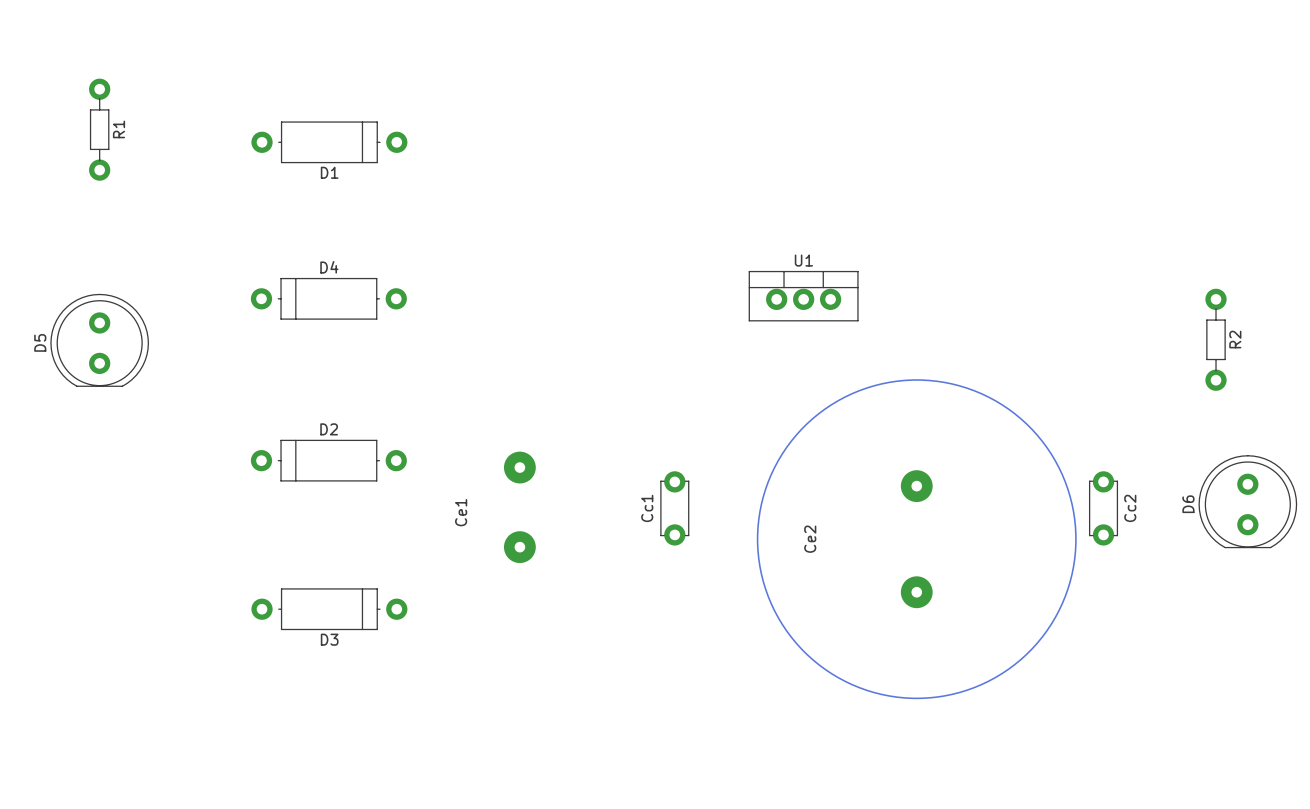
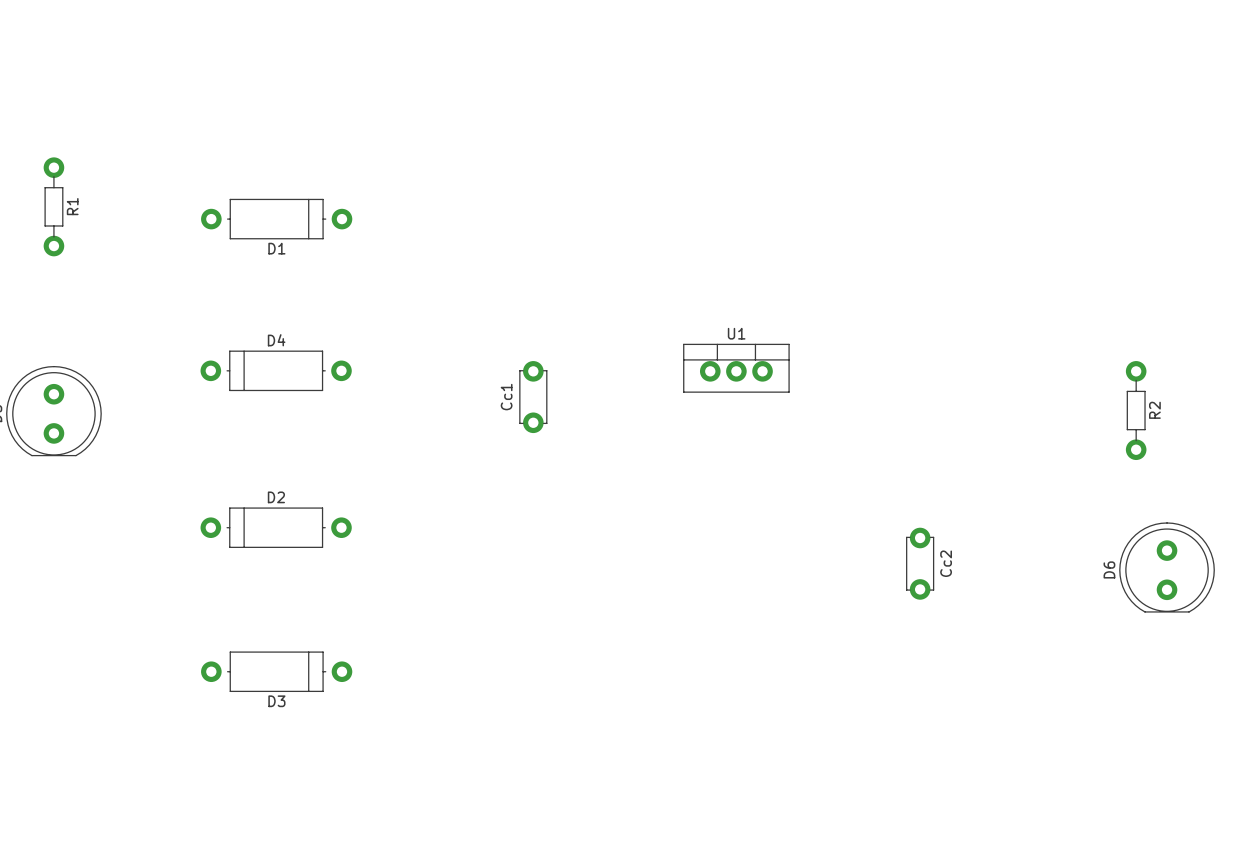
Ce1: (519, 507) -> none
Cc1 position: (674, 508) -> (533, 397)
Cc2 position: (1103, 508) -> (920, 563)
Ce2: (916, 539) -> none

